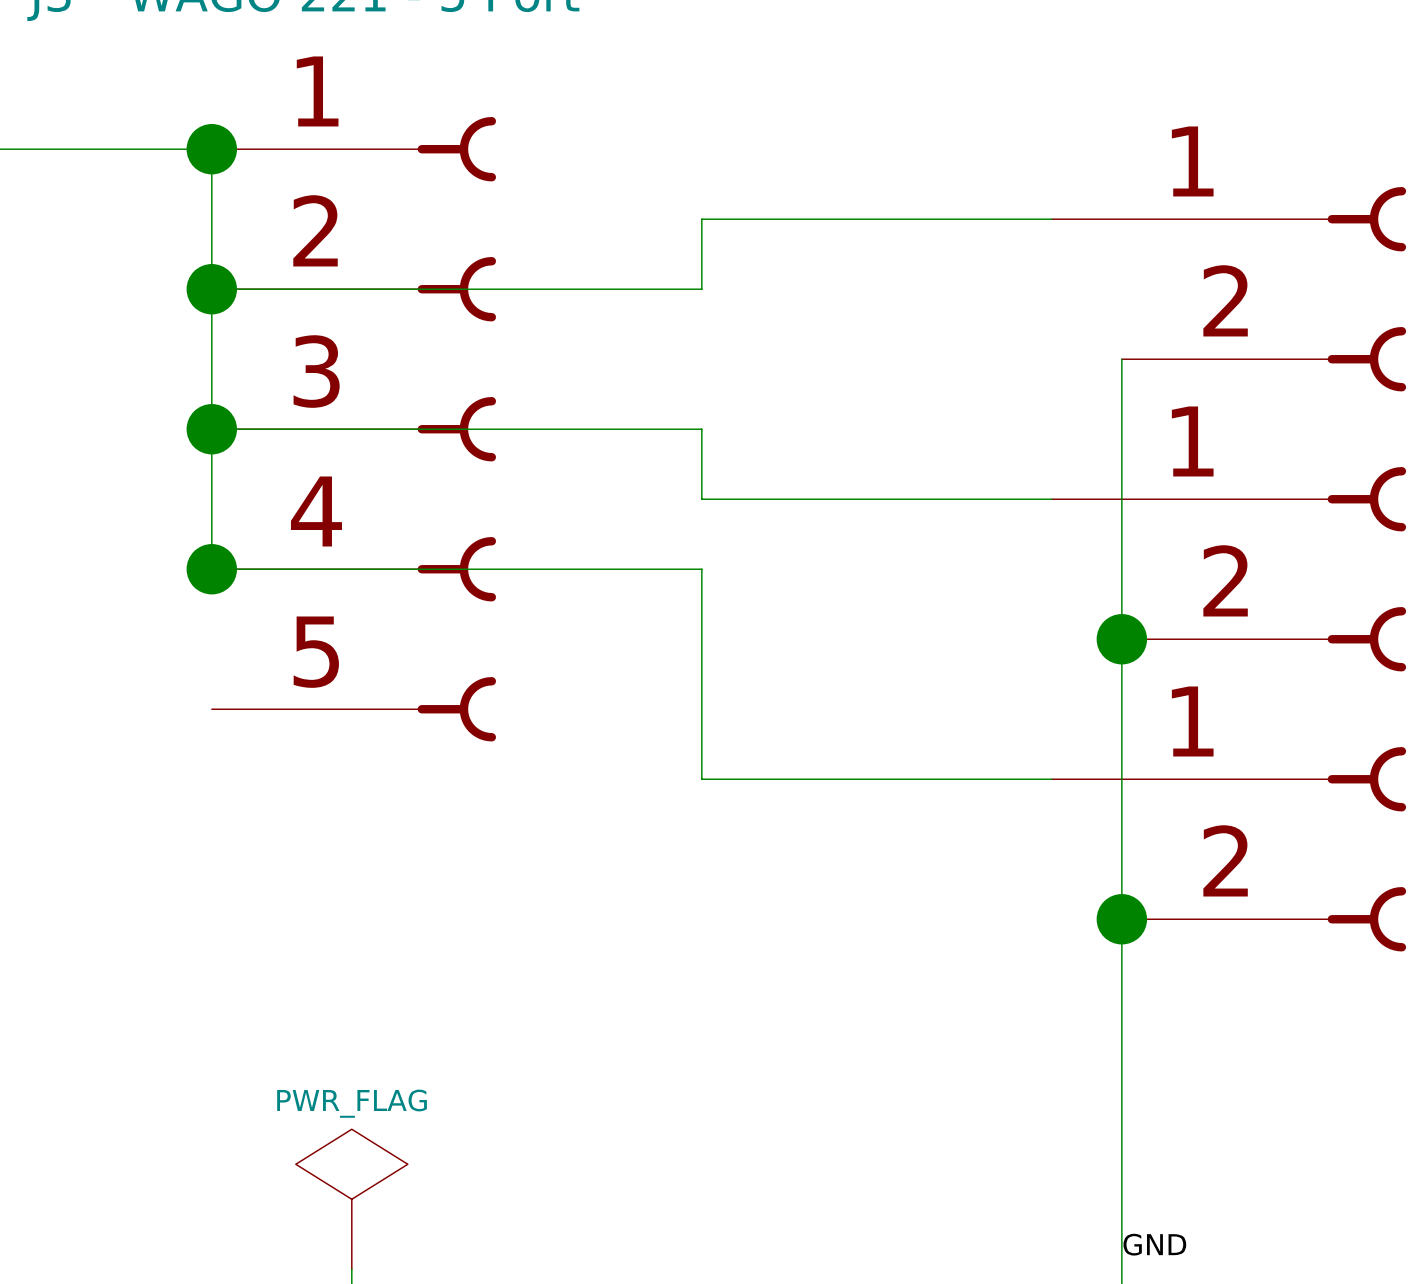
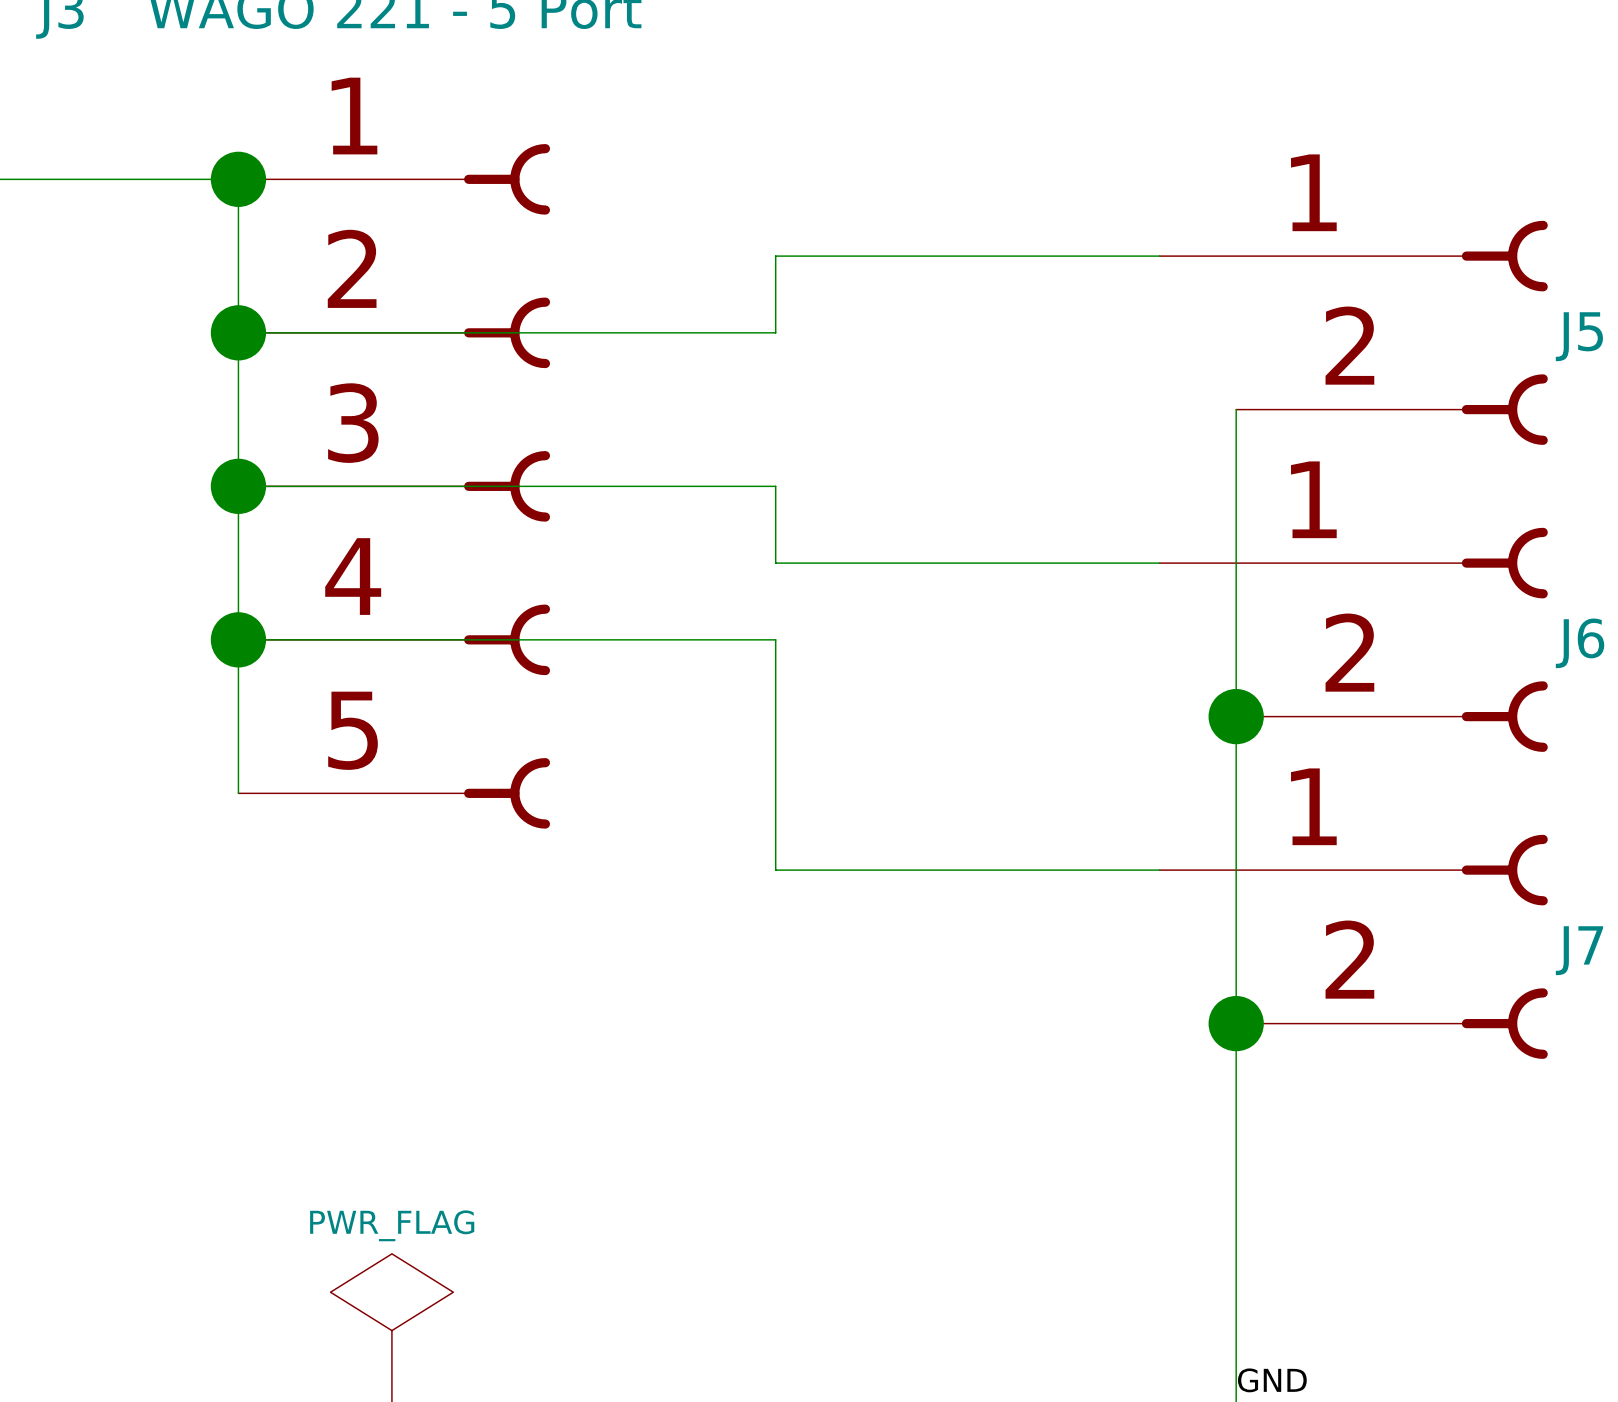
wire: none -> (238, 639) (238, 793)

